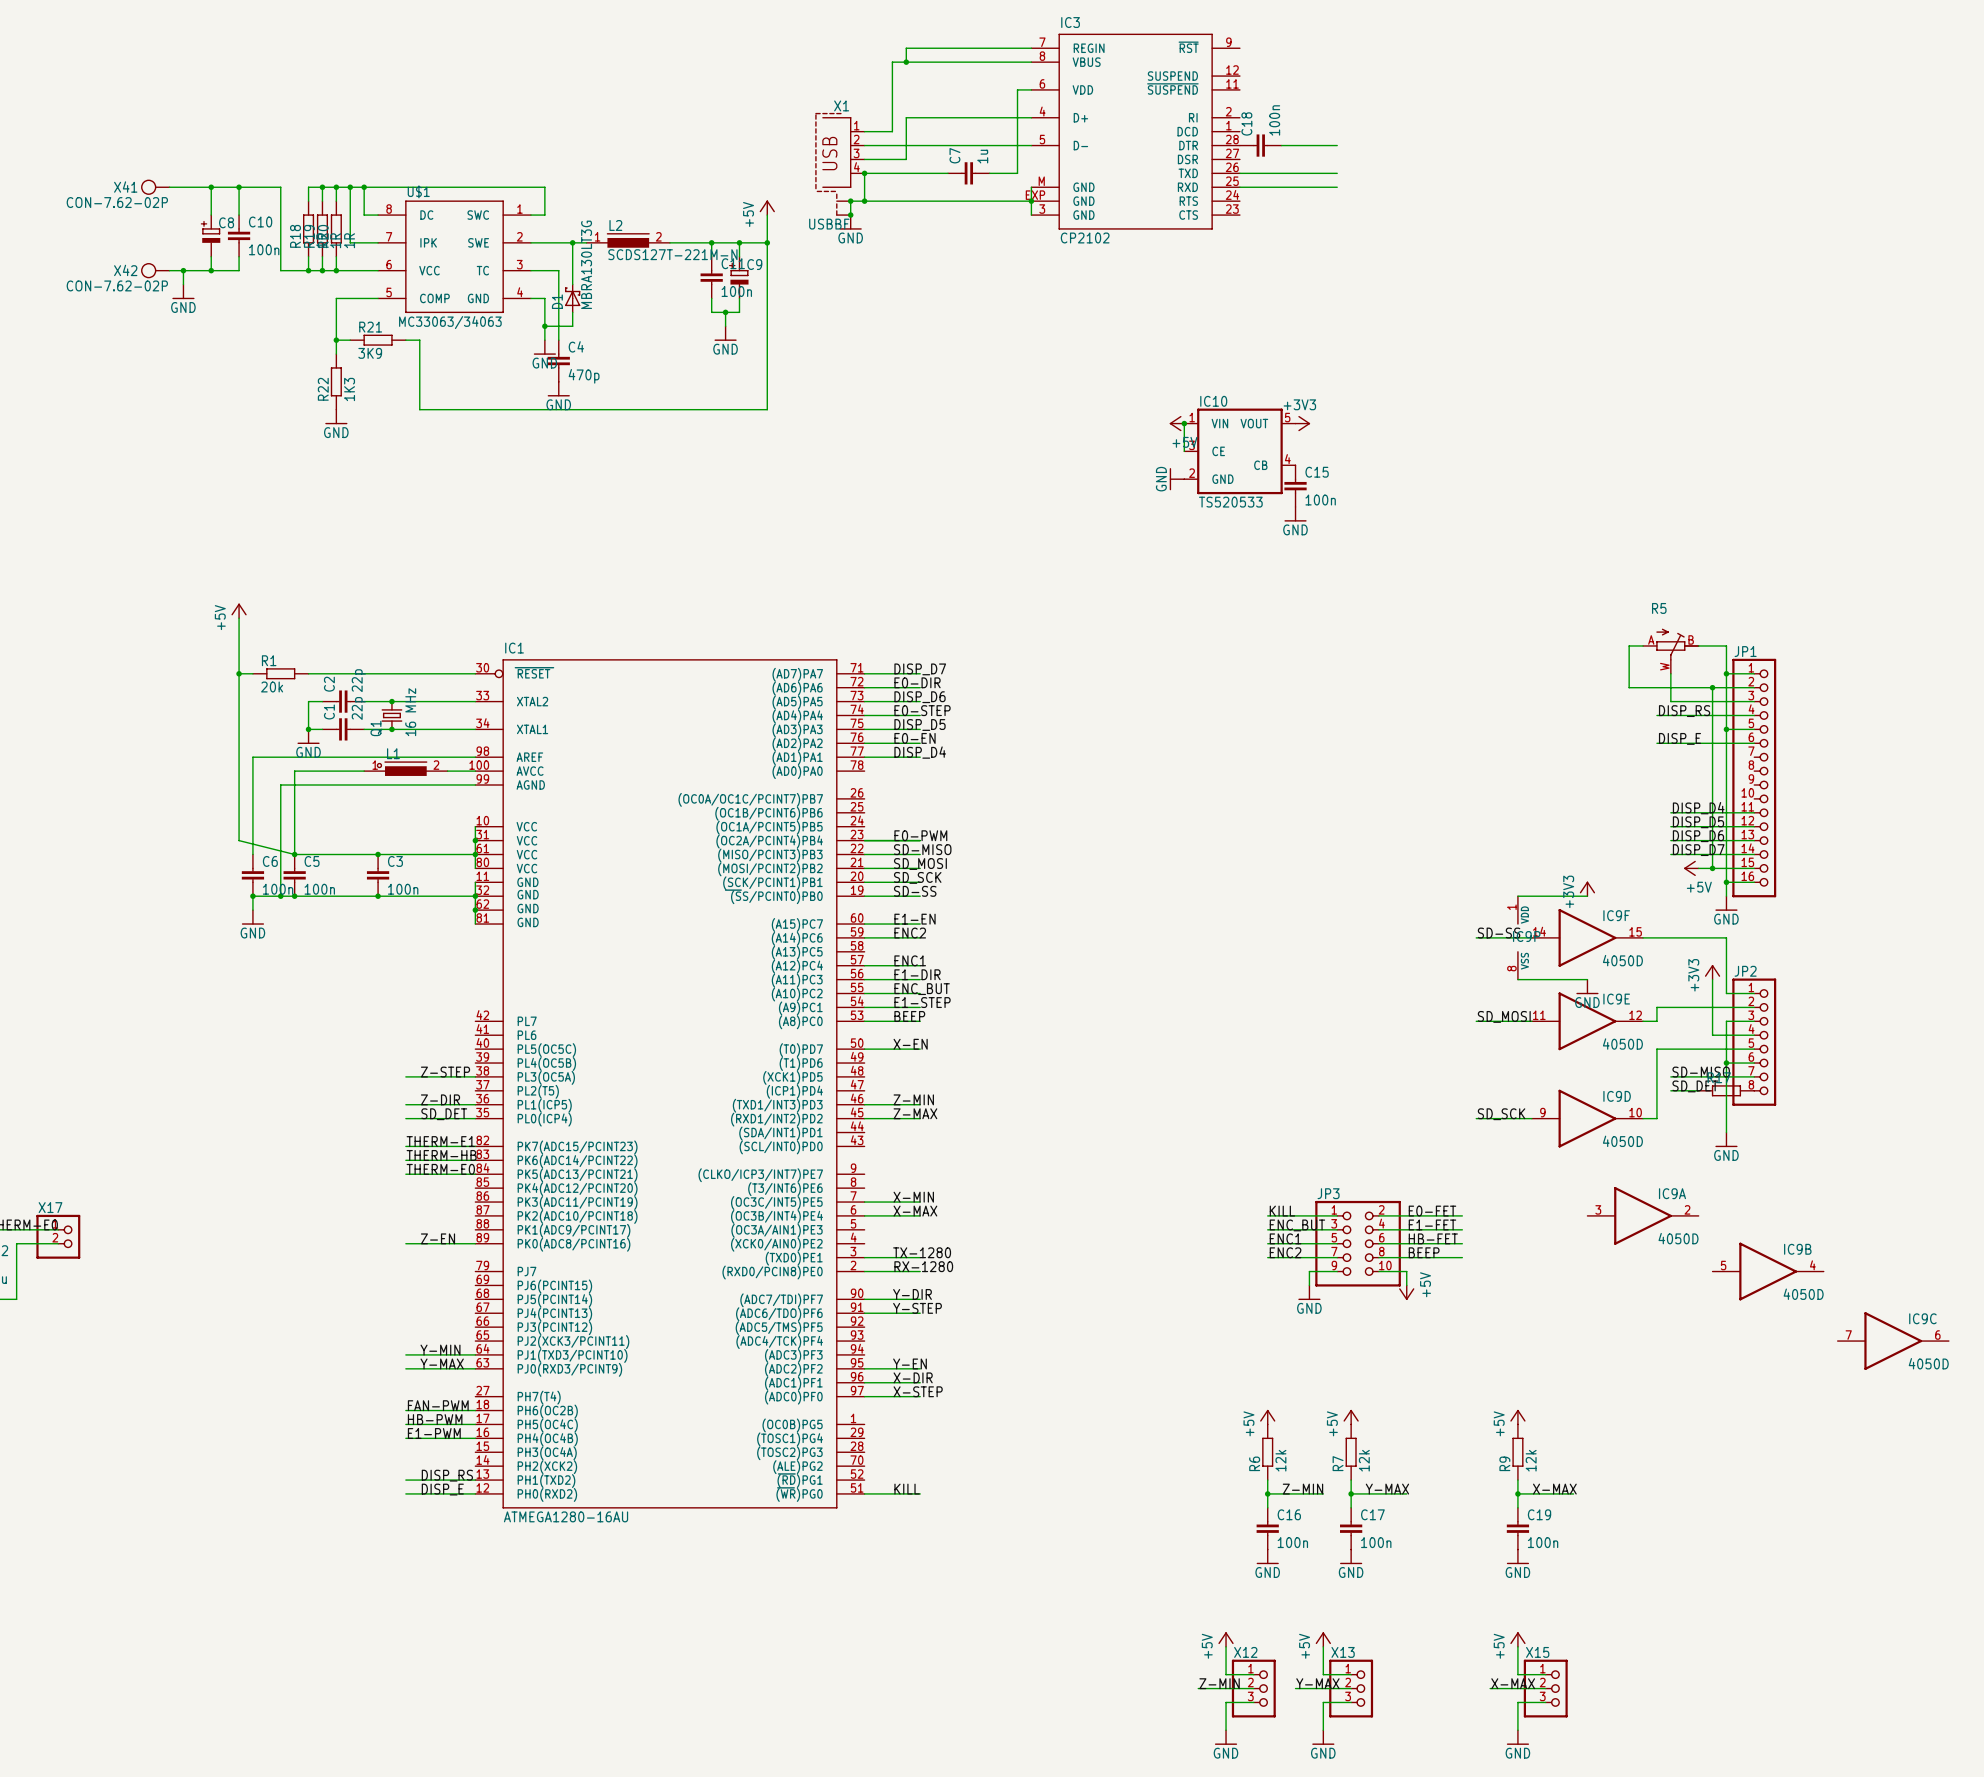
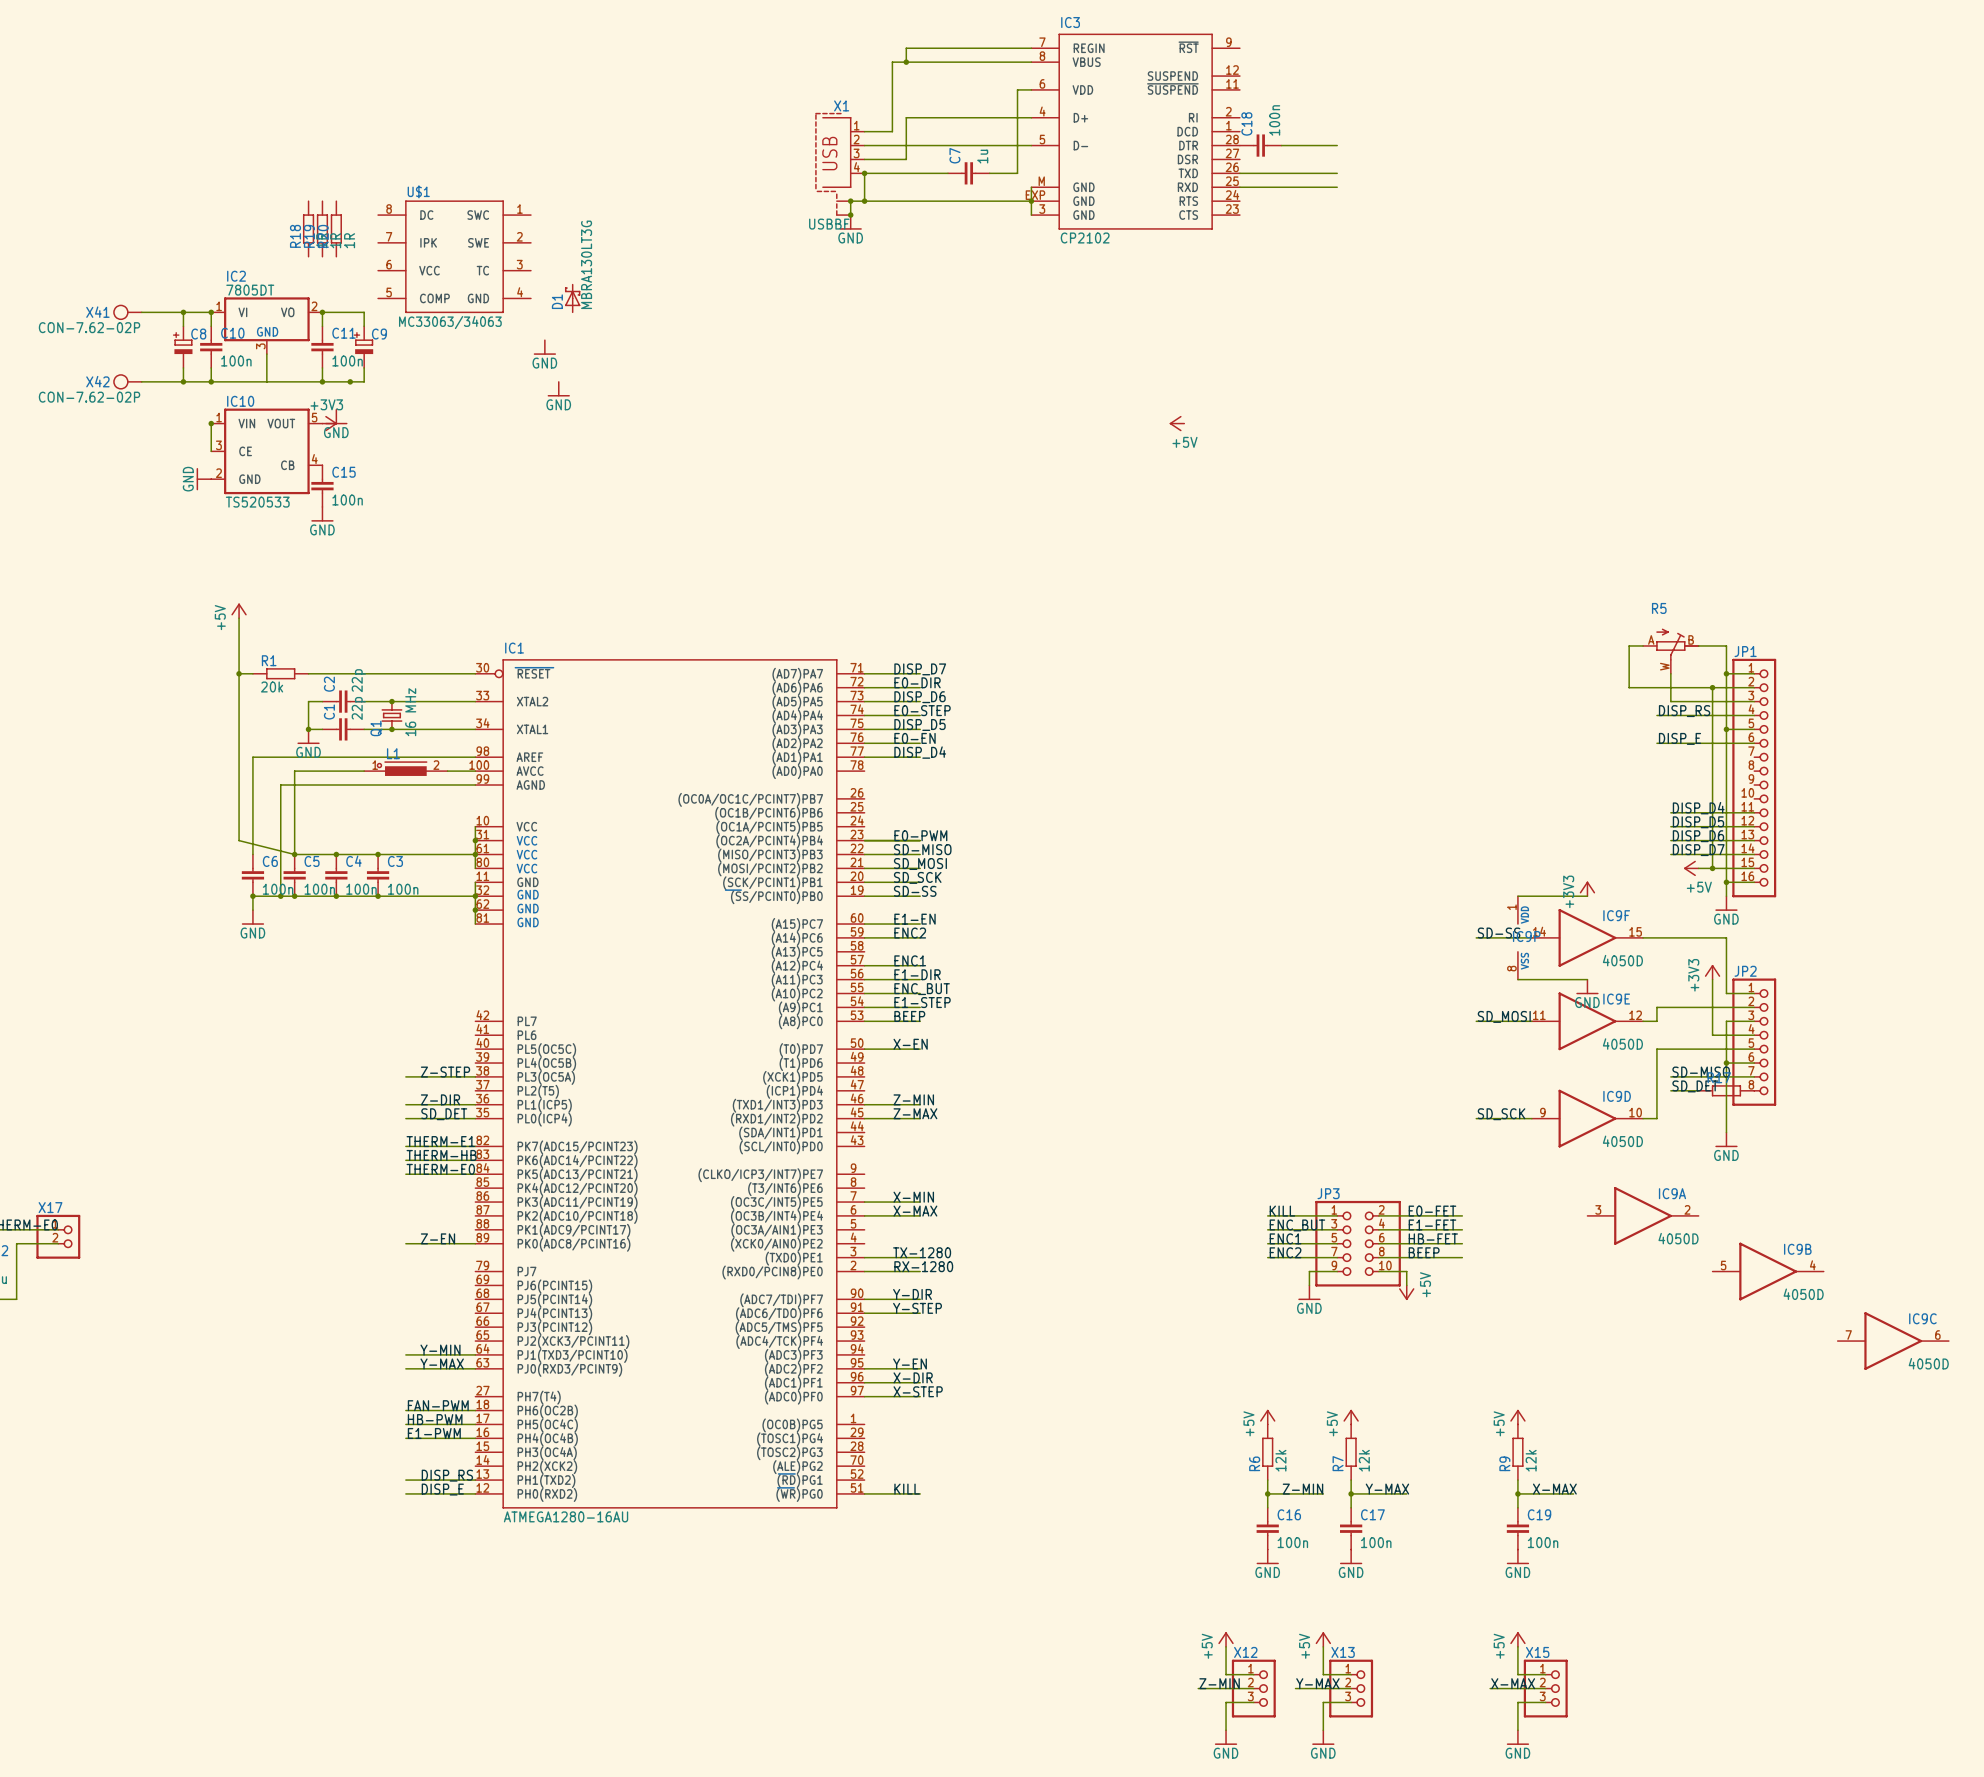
X41 position: (155, 187) -> (127, 312)
wire: (169, 187) (280, 187) (280, 270) (378, 270) -> none
wire: (211, 187) (211, 215) -> none
junction: (211, 187) -> none
wire: (239, 187) (239, 215) -> none
junction: (239, 187) -> none
wire: (322, 187) (322, 201) -> none
junction: (322, 187) -> none
wire: (336, 187) (336, 201) -> none
junction: (336, 187) -> none
wire: (350, 187) (350, 242) (378, 242) -> none
junction: (350, 187) -> none
wire: (364, 187) (364, 215) (378, 215) -> none
junction: (364, 187) -> none
wire: (308, 201) (308, 187) (544, 187) (544, 215) (530, 215) -> none
power symbol: +5V (767, 207) -> none
wire: (767, 215) (767, 409) (419, 409) (419, 340) (405, 340) -> none
C8 position: (211, 235) -> (183, 347)
C10 position: (239, 235) -> (211, 347)
L2: SCDS127T-221M-N (628, 240) -> none
wire: (530, 242) (586, 242) -> none
wire: (572, 242) (572, 284) -> none
junction: (572, 242) -> none
wire: (669, 242) (767, 242) -> none
wire: (711, 242) (711, 256) -> none
junction: (711, 242) -> none
wire: (739, 242) (739, 256) -> none
junction: (739, 242) -> none
junction: (767, 242) -> none
wire: (211, 256) (211, 270) -> (211, 367) (211, 381)
wire: (239, 256) (239, 270) (169, 270) -> none
wire: (308, 256) (308, 270) -> none
wire: (322, 256) (322, 270) -> (322, 367) (322, 381)
wire: (336, 256) (336, 270) -> none
X42 position: (155, 270) -> (127, 381)
wire: (183, 270) (183, 284) -> (183, 312) (183, 326)
junction: (183, 270) -> none
junction: (211, 270) -> none
junction: (308, 270) -> none
junction: (322, 270) -> none
junction: (336, 270) -> none
wire: (530, 270) (558, 270) (558, 340) -> none
C11 position: (711, 277) -> (322, 347)
C9 position: (739, 277) -> (364, 347)
power symbol: GND (183, 291) -> none
wire: (378, 298) (336, 298) (336, 354) -> none
wire: (530, 298) (544, 298) (544, 340) -> none
wire: (711, 298) (711, 312) (739, 312) (739, 298) -> none
wire: none -> (141, 312) (211, 312) (211, 326)
junction: none -> (183, 312)
junction: none -> (211, 312)
junction: none -> (322, 312)
wire: (572, 312) (572, 326) (544, 326) -> none
wire: (725, 312) (725, 326) -> none
junction: (725, 312) -> none
IC2: none -> 7805DT (266, 325)
wire: none -> (322, 326) (322, 312) (364, 312) (364, 326)
junction: (544, 326) -> none
power symbol: GND (725, 333) -> none
wire: (336, 340) (350, 340) -> none
junction: (336, 340) -> none
R21: 3K9 (378, 340) -> none
wire: none -> (266, 354) (266, 381)
C4 position: (558, 361) -> (336, 875)
wire: none -> (183, 367) (183, 381)
wire: none -> (364, 367) (364, 381) (141, 381)
C4 value: 470p (584, 376) -> 100n (361, 889)
junction: none -> (183, 381)
junction: none -> (211, 381)
junction: none -> (322, 381)
R22: 1K3 (336, 381) -> none
junction: none -> (350, 381)
wire: none -> (211, 423) (211, 451)
junction: none -> (211, 423)
power symbol: none -> +3V3 (329, 423)
wire: (1184, 423) (1184, 451) -> none
junction: (1184, 423) -> none
power symbol: +3V3 (1302, 423) -> none
IC10 position: (1239, 451) -> (266, 451)
power symbol: none -> GND (203, 479)
power symbol: GND (1177, 479) -> none
C15 position: (1295, 486) -> (322, 486)
power symbol: none -> GND (322, 514)
power symbol: GND (1295, 514) -> none
junction: none -> (336, 854)
junction: none -> (336, 896)

